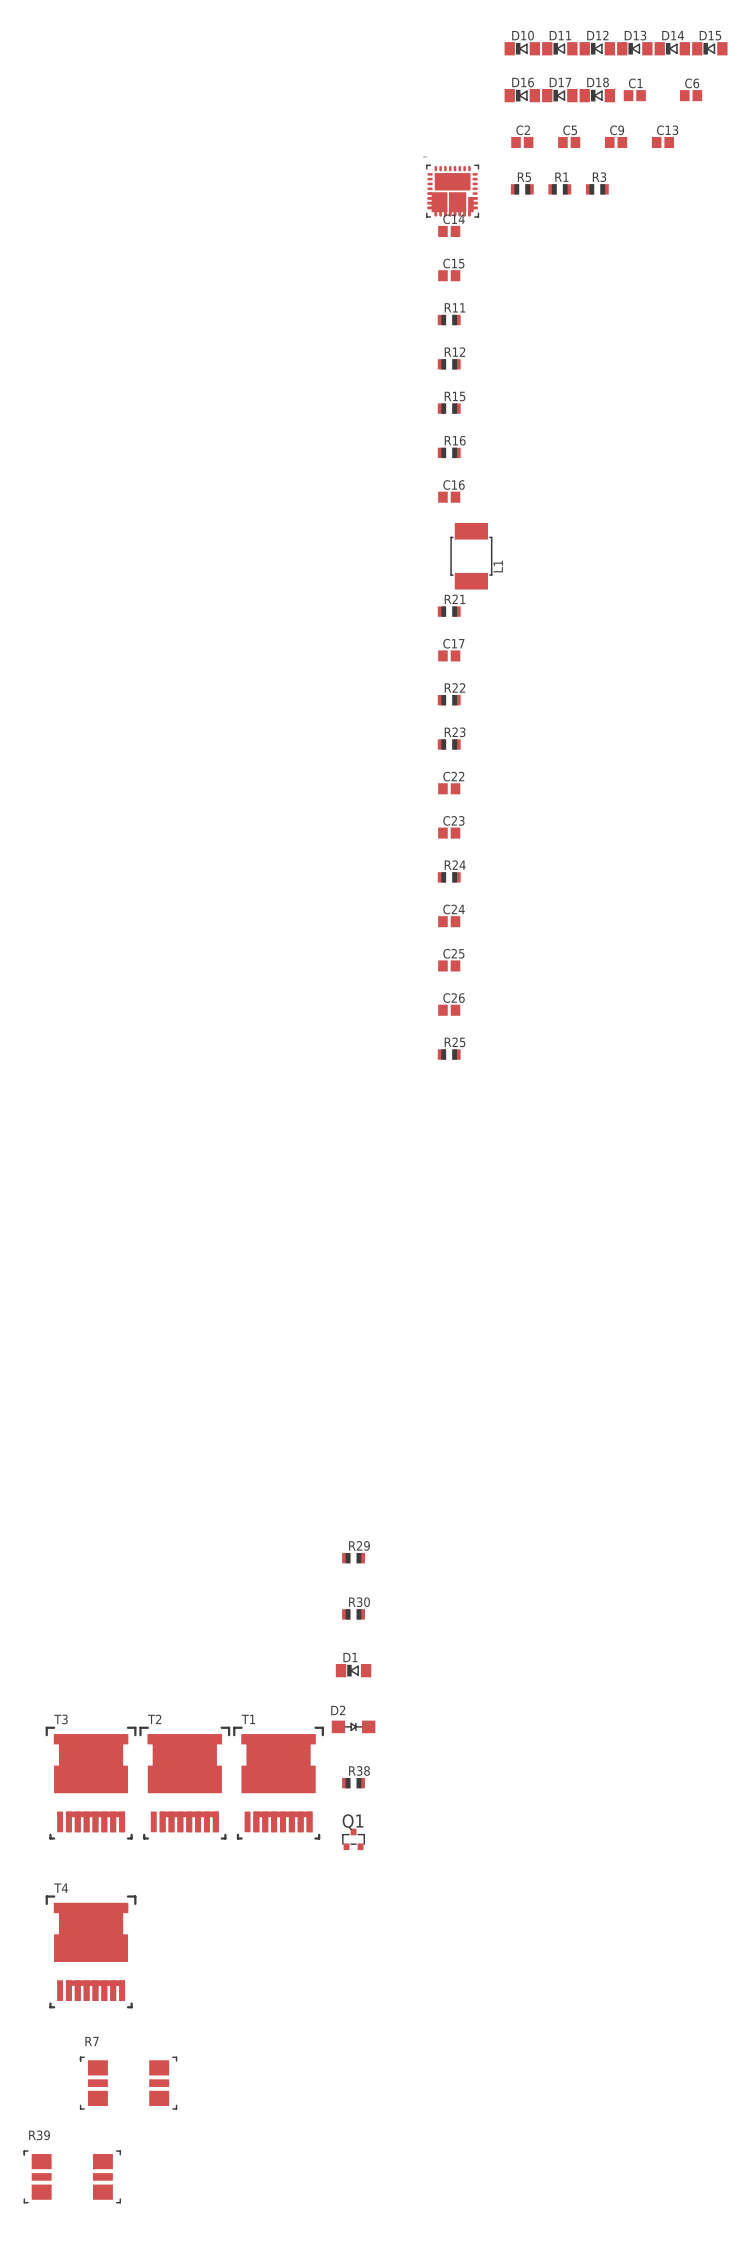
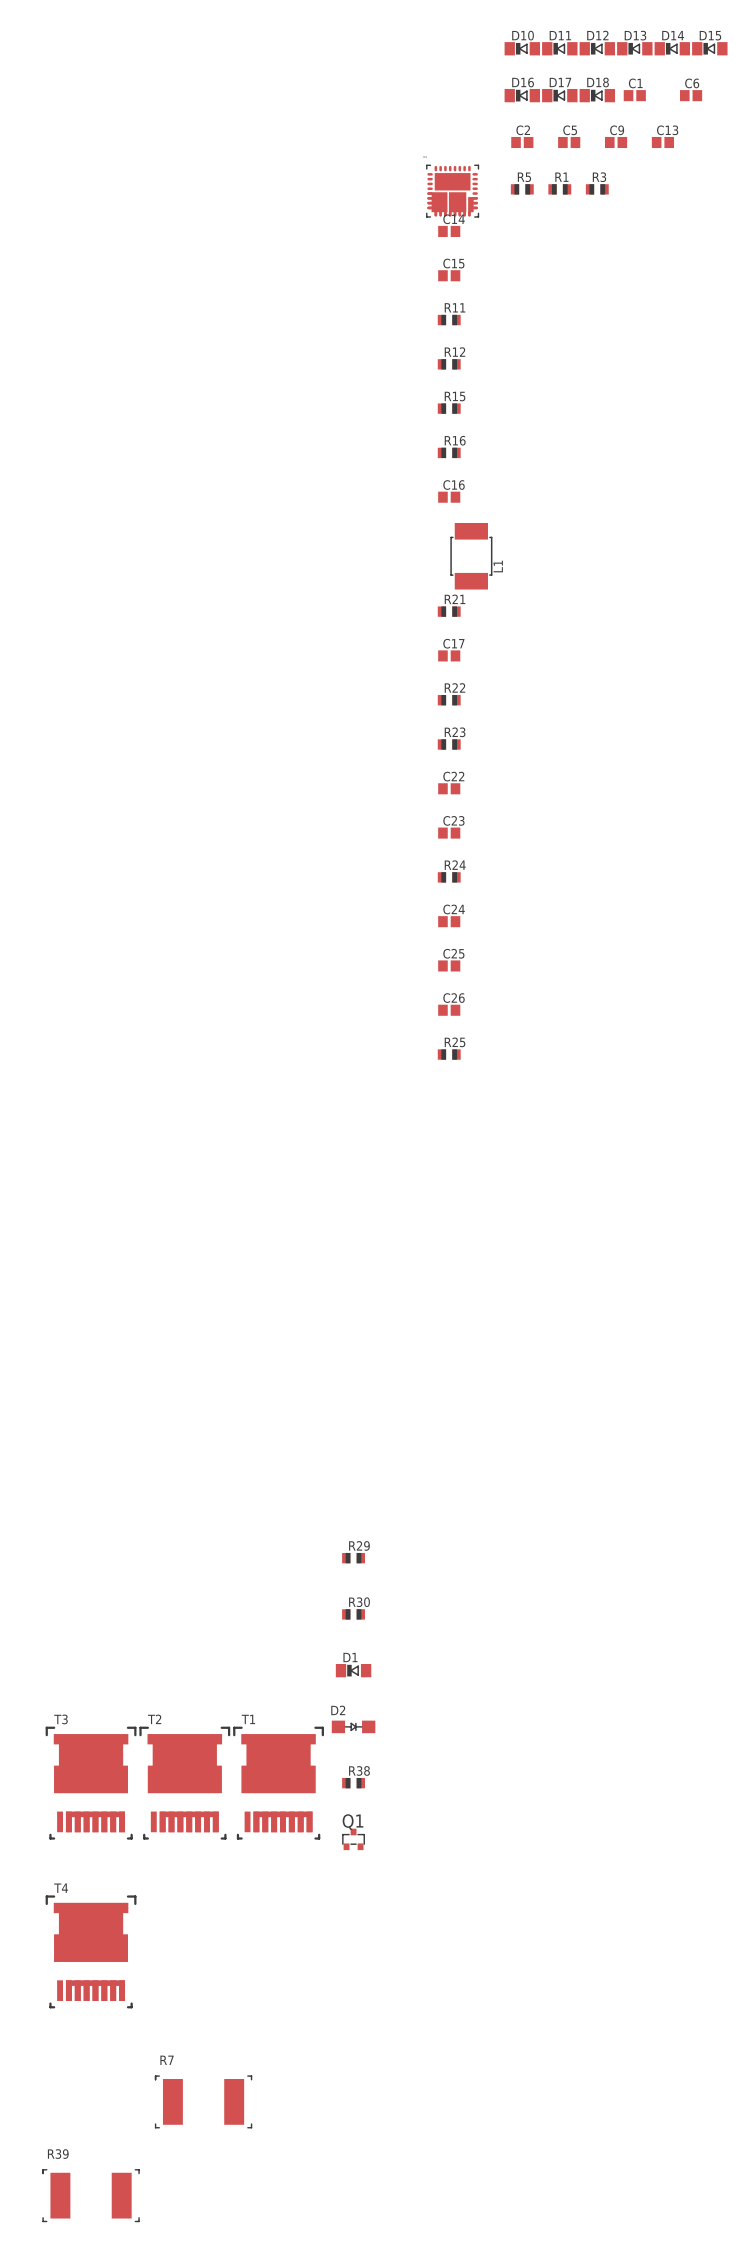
R7 footprint: [80, 2056, 178, 2110] -> [155, 2075, 253, 2129]
R39 footprint: [23, 2150, 121, 2204] -> [42, 2169, 140, 2222]

